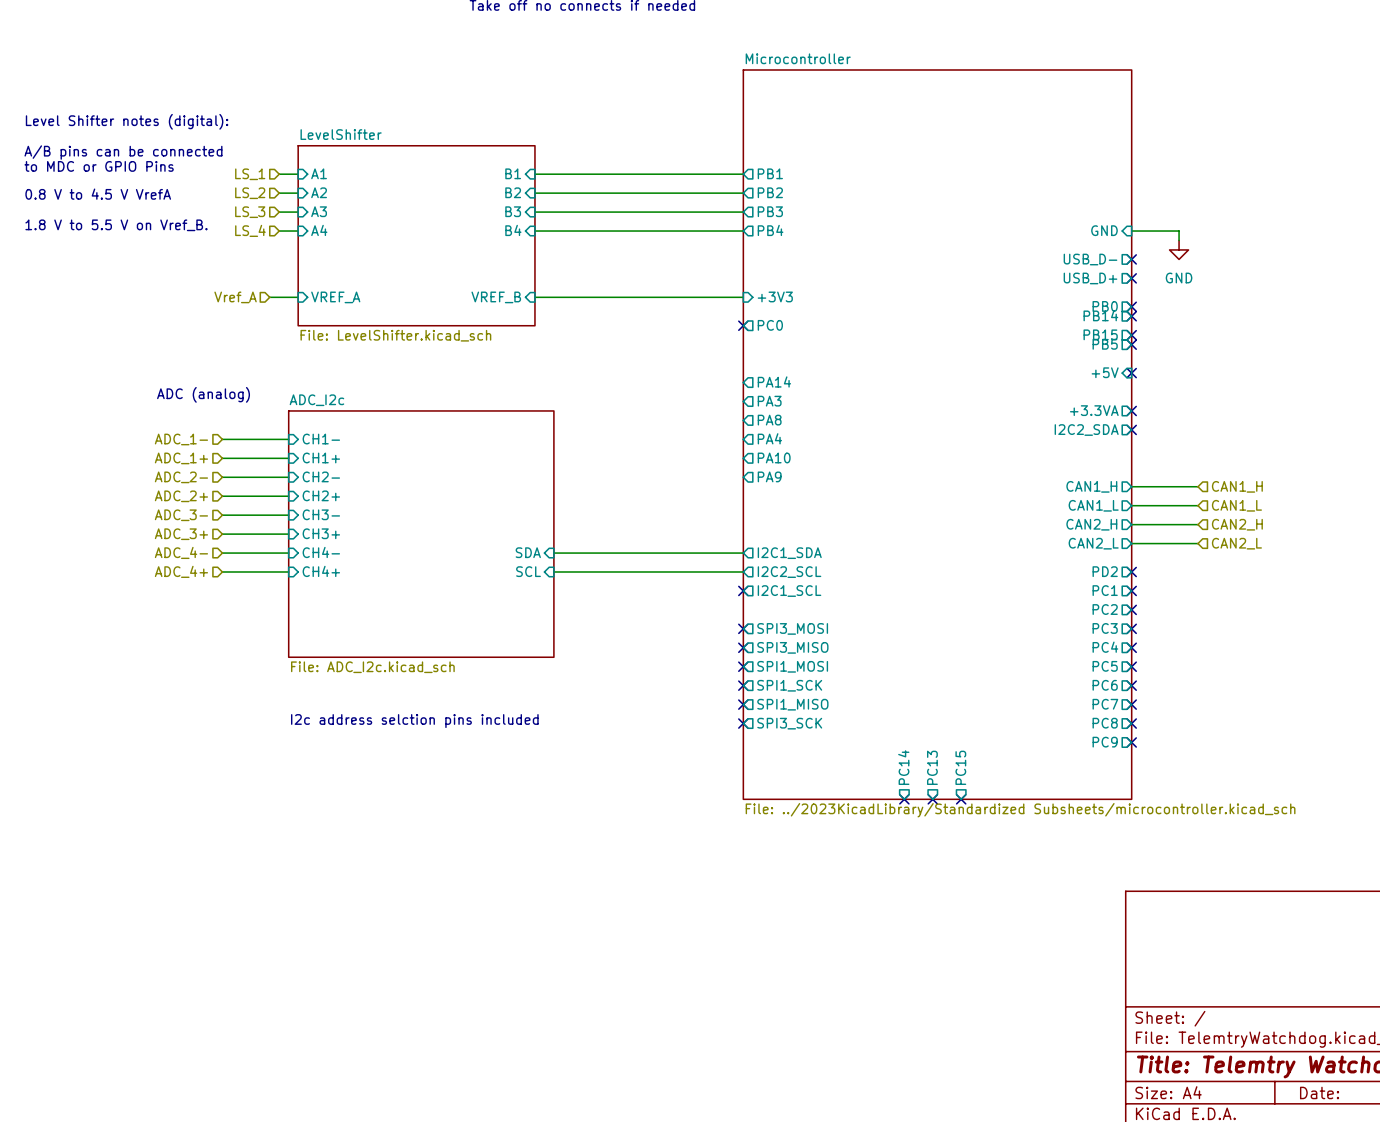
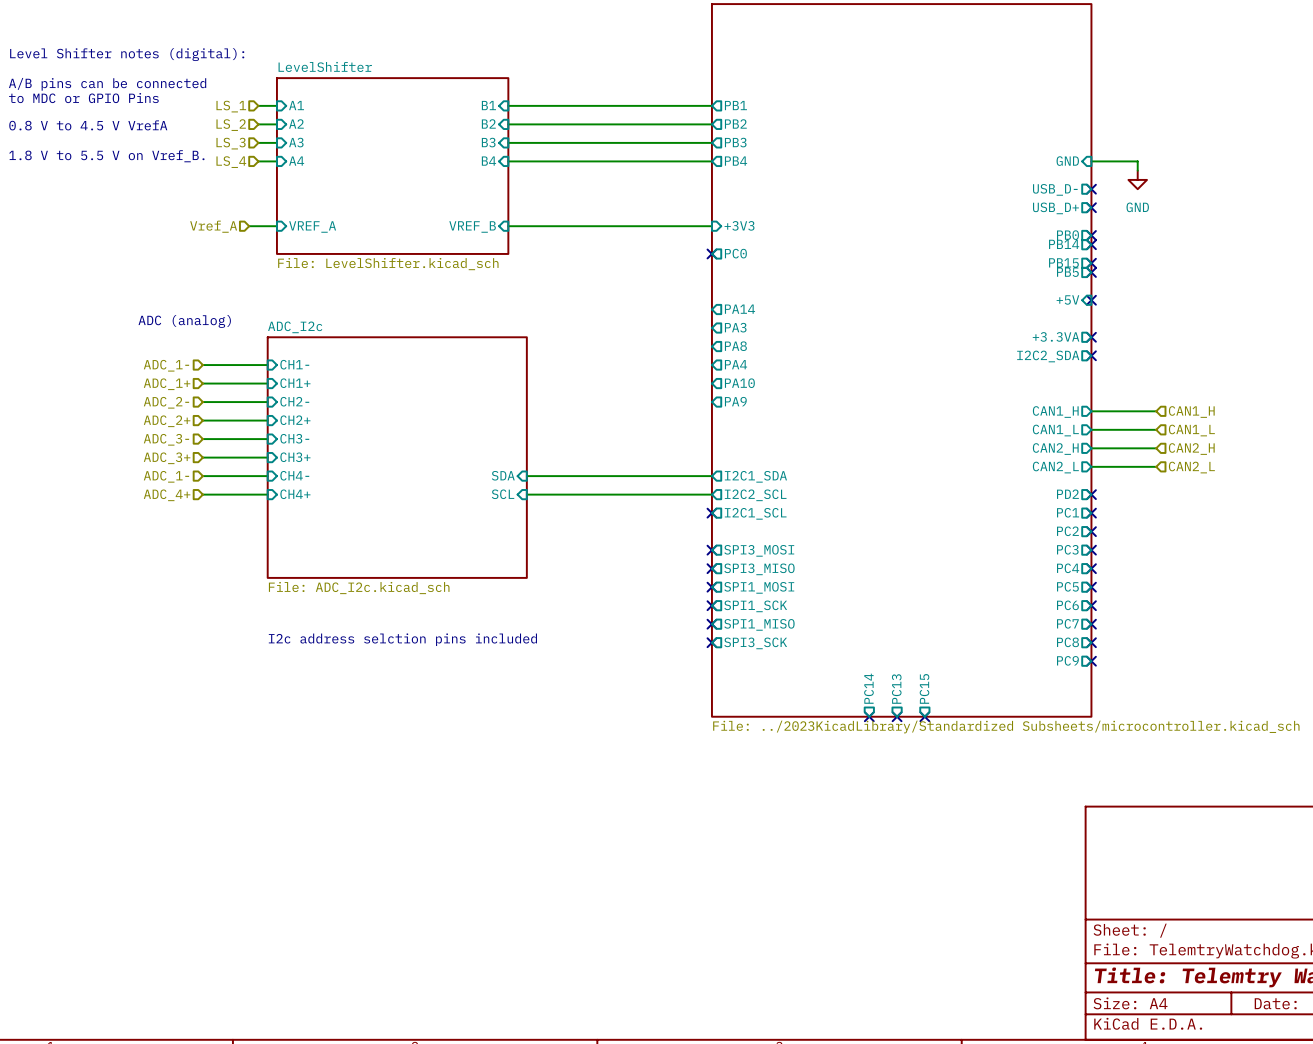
hierarchical label: ADC_4- (181, 552) -> ADC_1- (166, 476)

